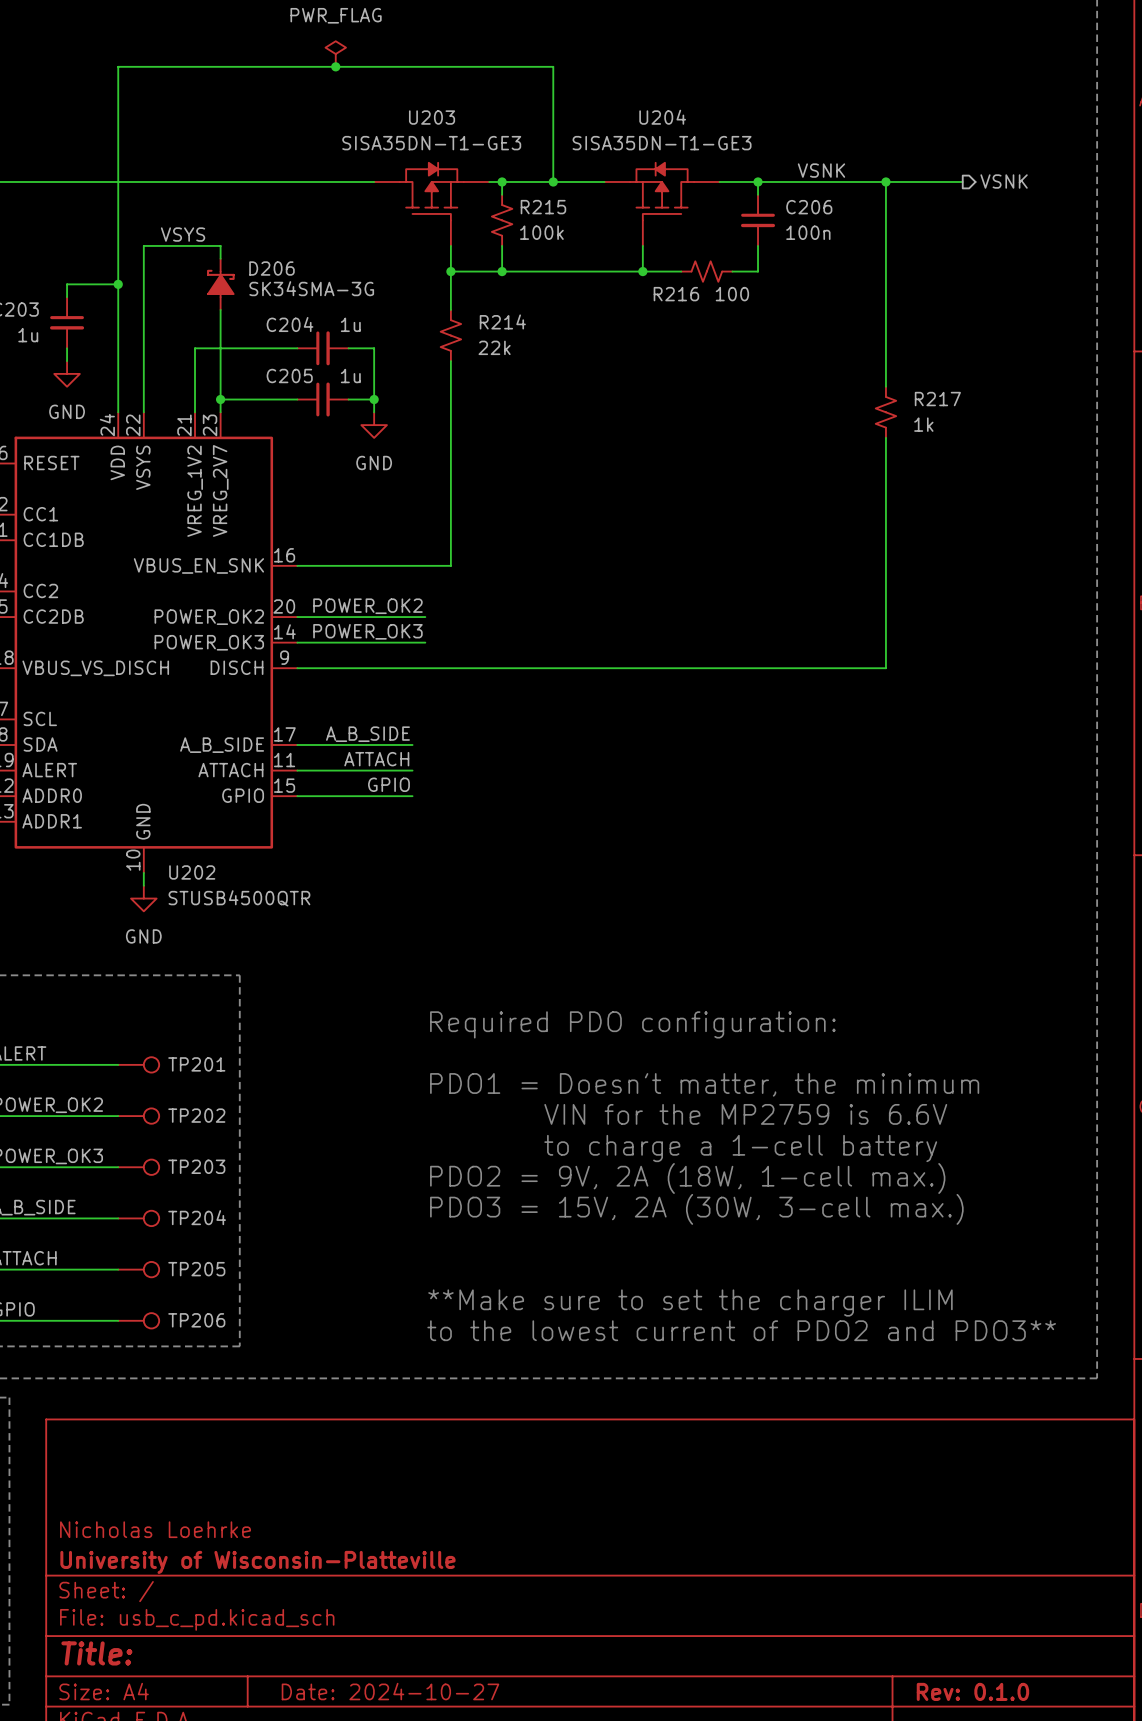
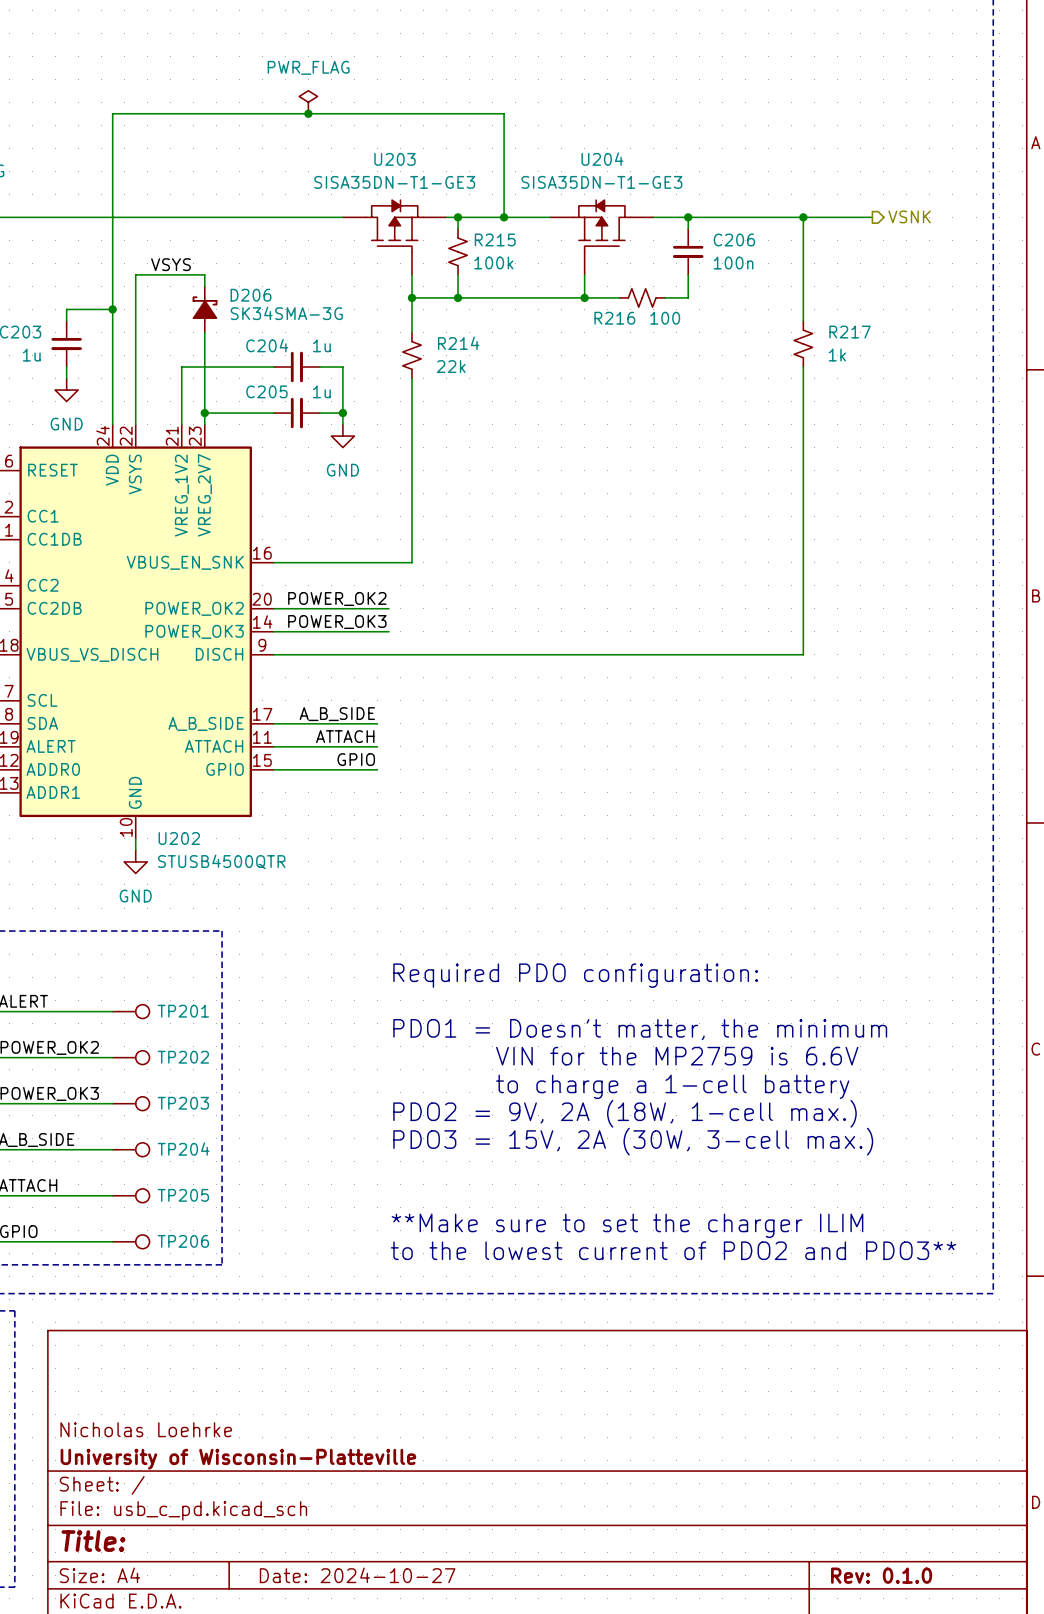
label: VSNK (821, 170) -> none
R217 position: (885, 412) -> (803, 343)

